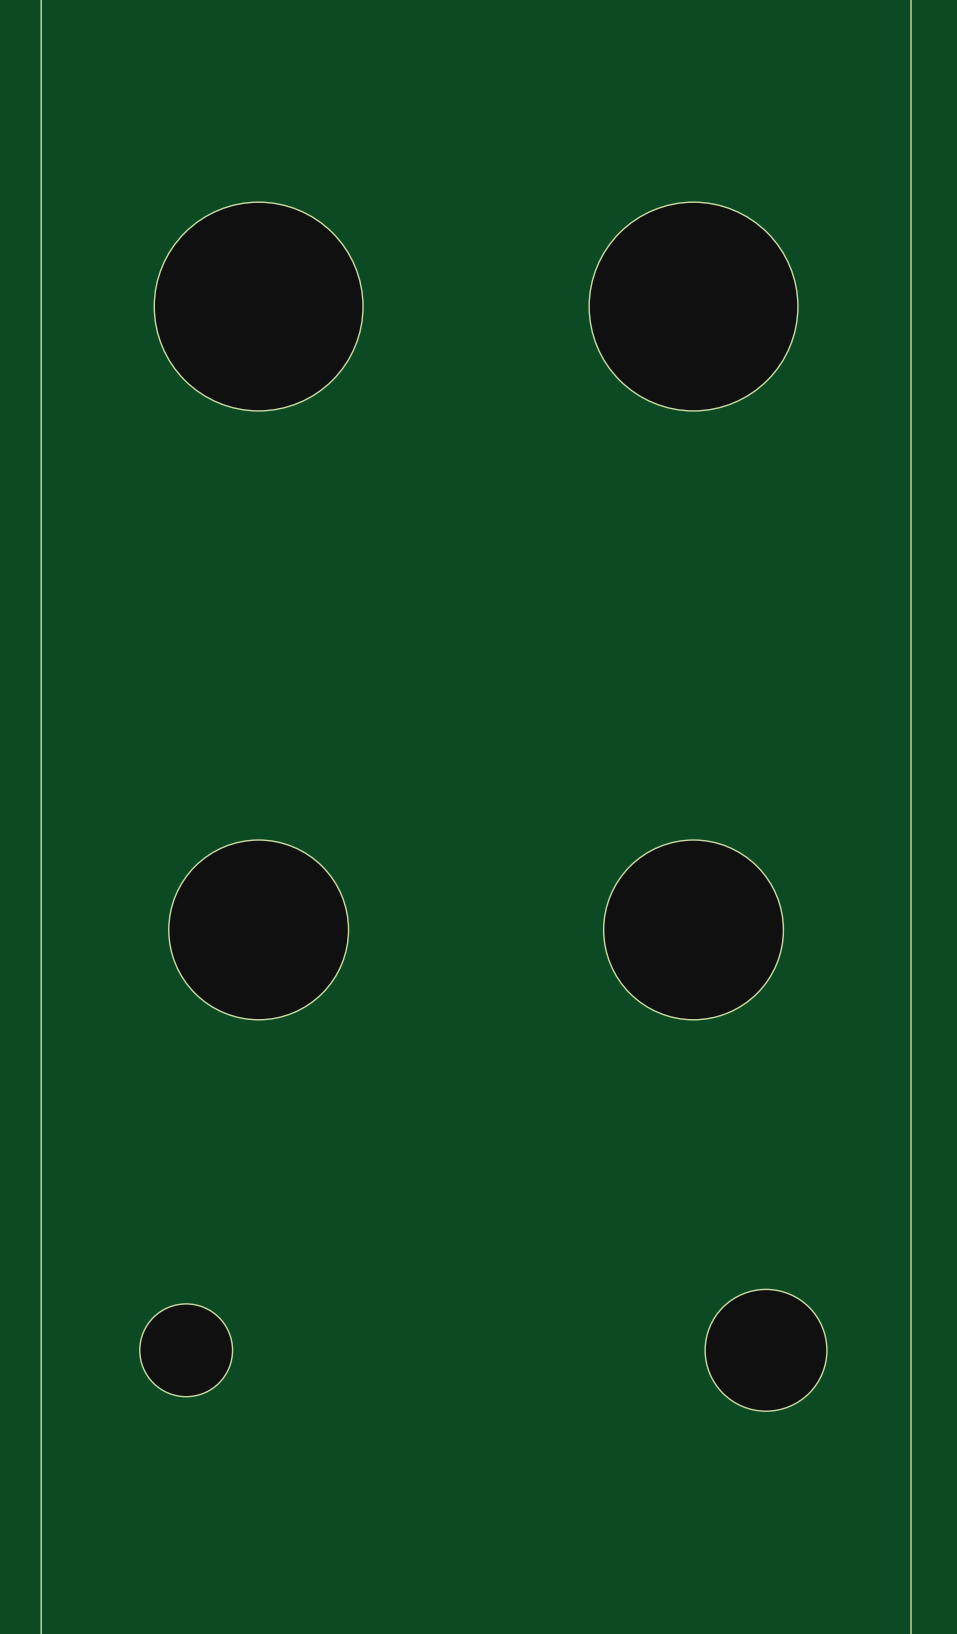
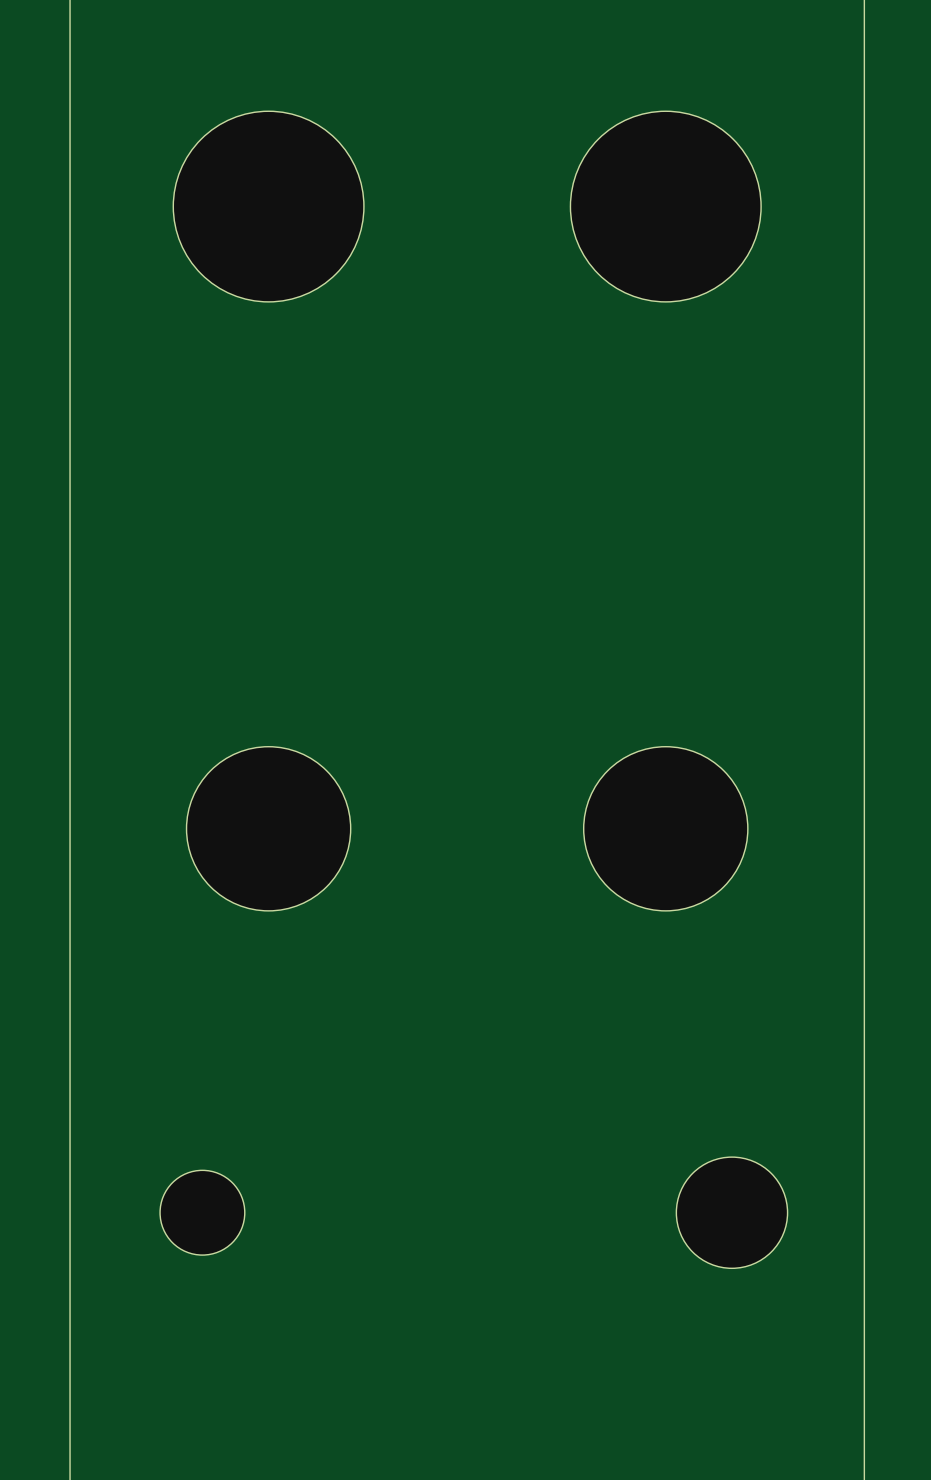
part position: (258, 306) -> (268, 206)
part position: (693, 306) -> (665, 206)

